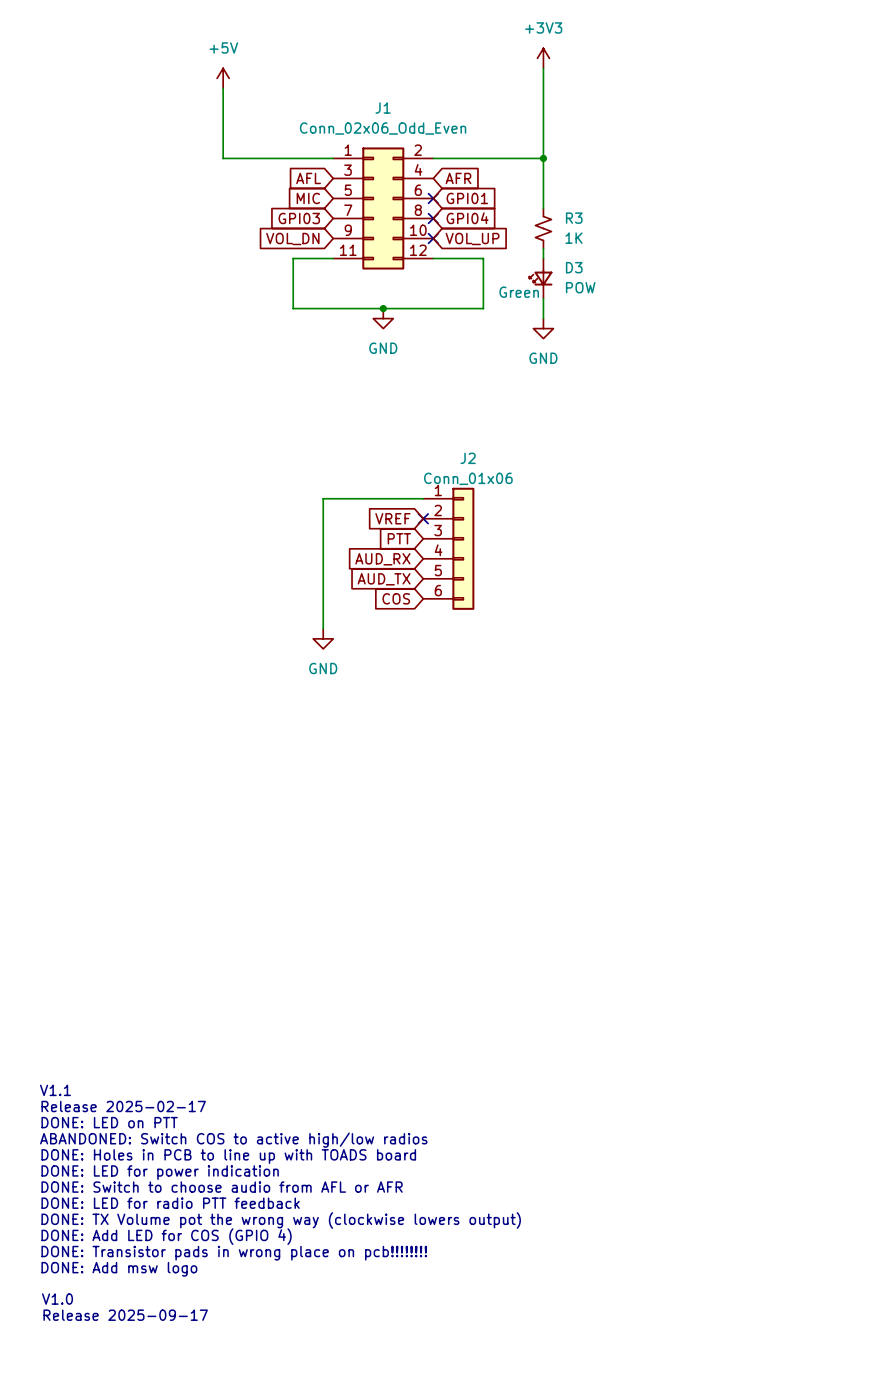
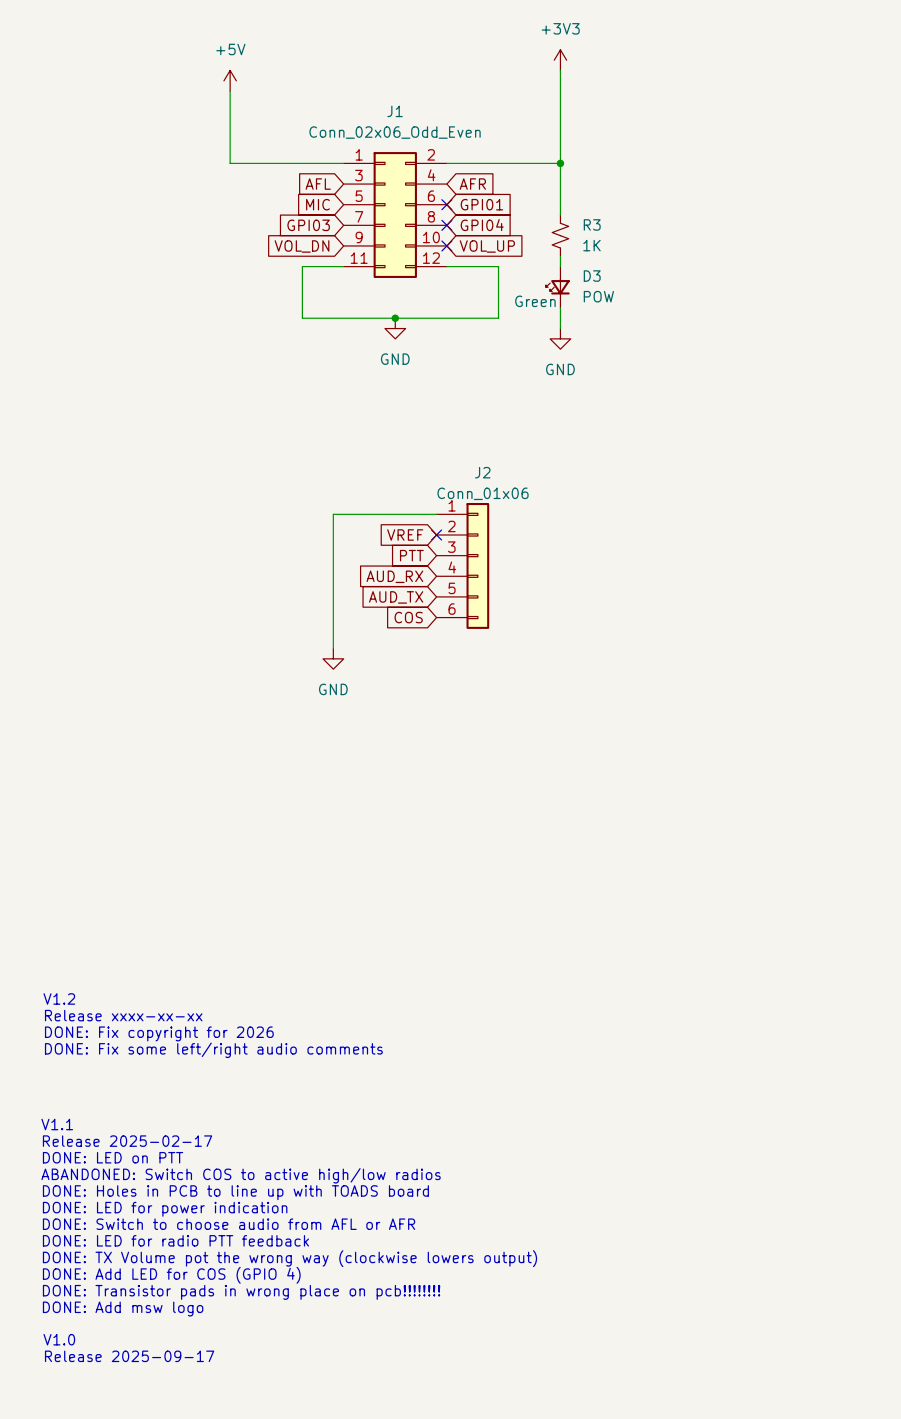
text: none -> V1.2 (59, 998)
text: none -> Release xxxx-xx-xx (123, 1015)
text: none -> DONE: Fix copyright for 2026 (159, 1033)
text: none -> DONE: Fix some left/right audio comments (213, 1050)

